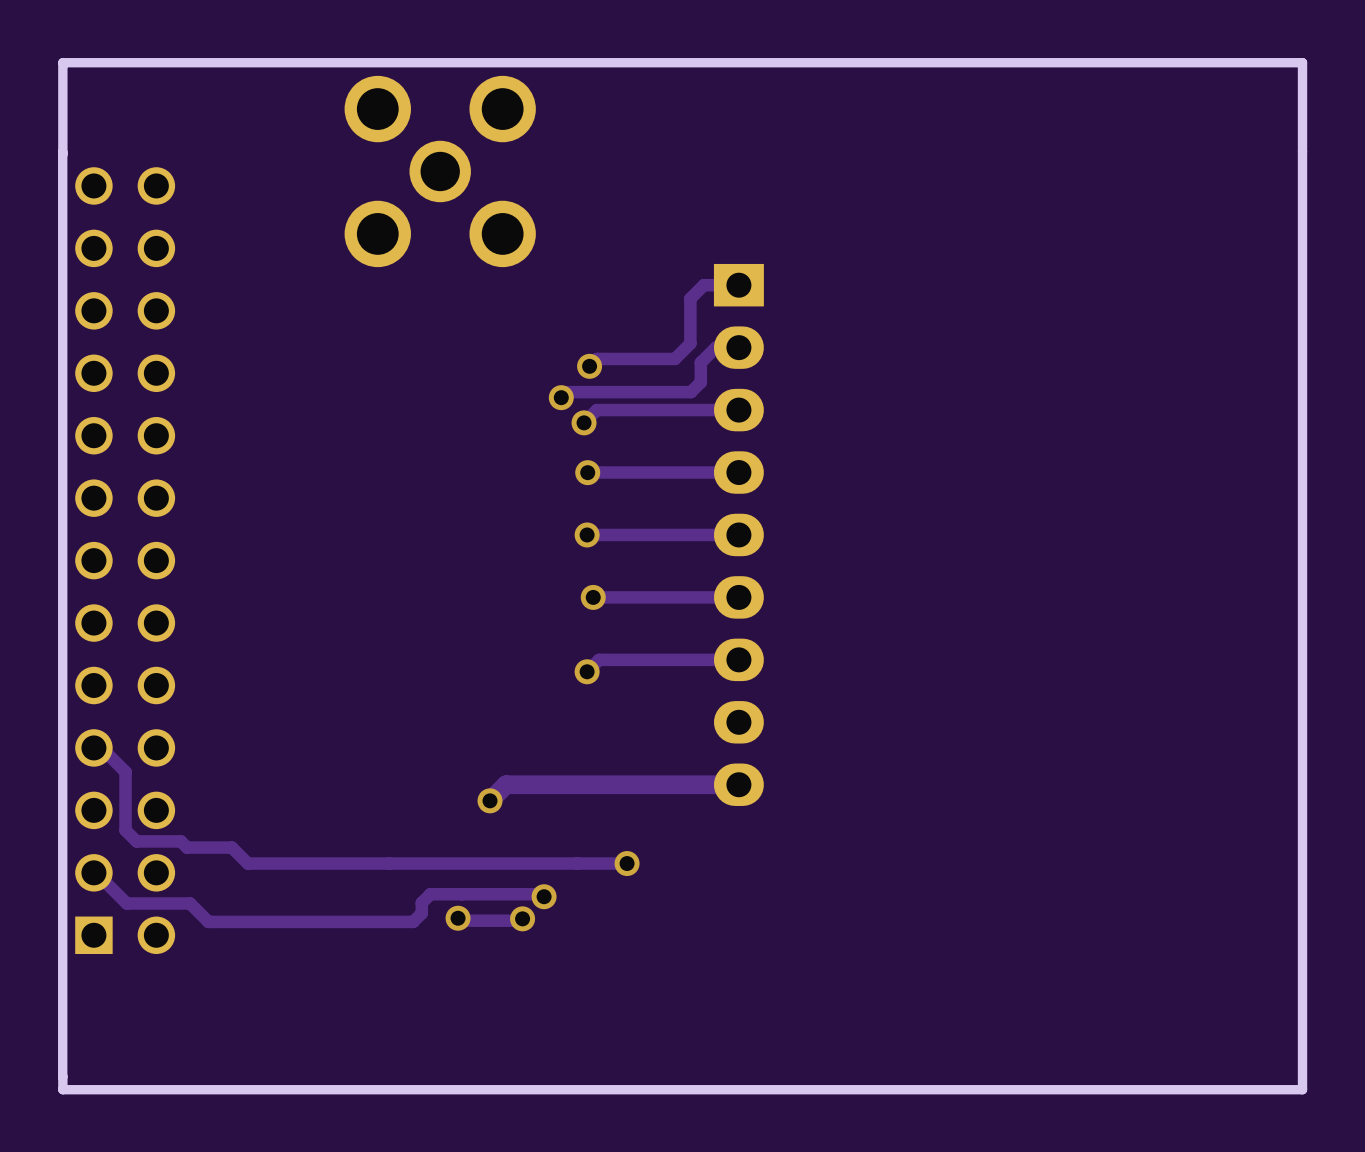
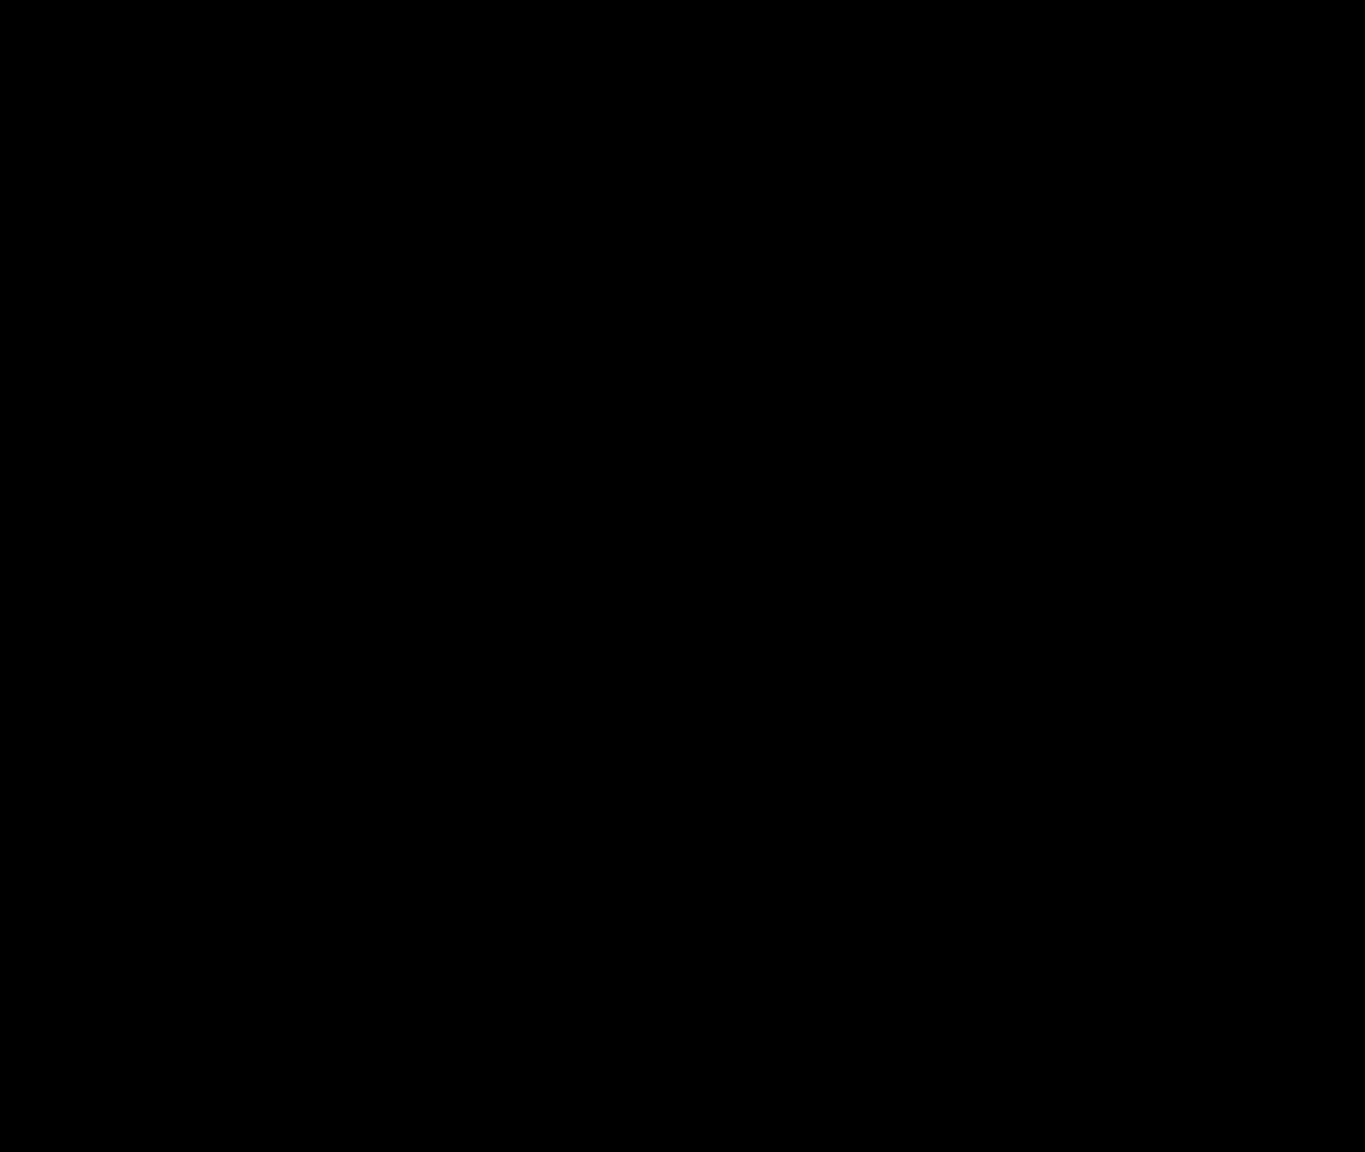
board edge: (62, 151) (62, 1077) -> none
board edge: (62, 153) (62, 62) (1302, 62) (1302, 1089) (62, 1089) (62, 1076) -> none
part: (440, 171) -> none
track: (738, 285) (703, 285) (690, 298) (690, 343) (675, 358) (596, 358) (589, 366) -> none
track: (738, 347) (715, 347) (700, 362) (700, 382) (690, 392) (566, 392) (561, 397) -> none
via: (589, 366) -> none
via: (561, 397) -> none
track: (738, 410) (596, 410) (584, 422) -> none
via: (584, 422) -> none
via: (587, 472) -> none
track: (738, 472) (587, 472) -> none
via: (587, 534) -> none
track: (738, 534) (587, 534) -> none
part: (738, 534) -> none
part: (125, 560) -> none
via: (593, 597) -> none
track: (738, 597) (593, 597) -> none
track: (738, 659) (599, 659) (587, 671) -> none
via: (587, 671) -> none
track: (93, 747) (101, 747) (125, 771) (125, 830) (136, 841) (180, 841) (187, 847) (231, 847) (247, 863) (627, 863) -> none
track: (738, 784) (506, 784) (490, 800) -> none
via: (490, 800) -> none
via: (627, 863) -> none
track: (93, 872) (126, 903) (190, 903) (208, 921) (413, 921) (421, 913) (421, 902) (430, 894) (541, 894) (544, 896) -> none
via: (544, 896) -> none
track: (458, 918) (460, 920) (520, 920) (522, 918) -> none
via: (458, 918) -> none
via: (522, 918) -> none

